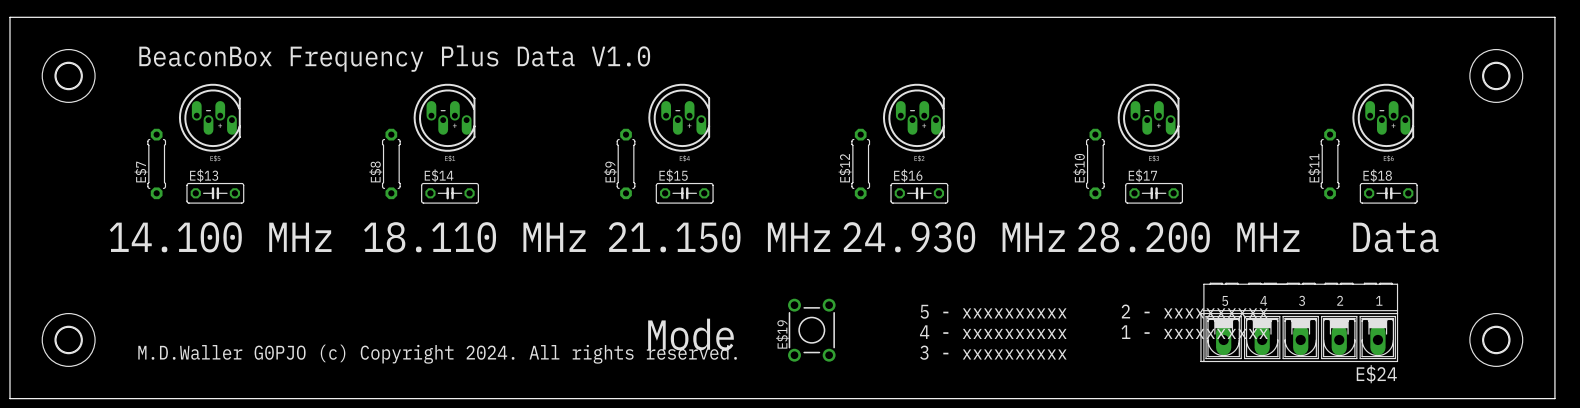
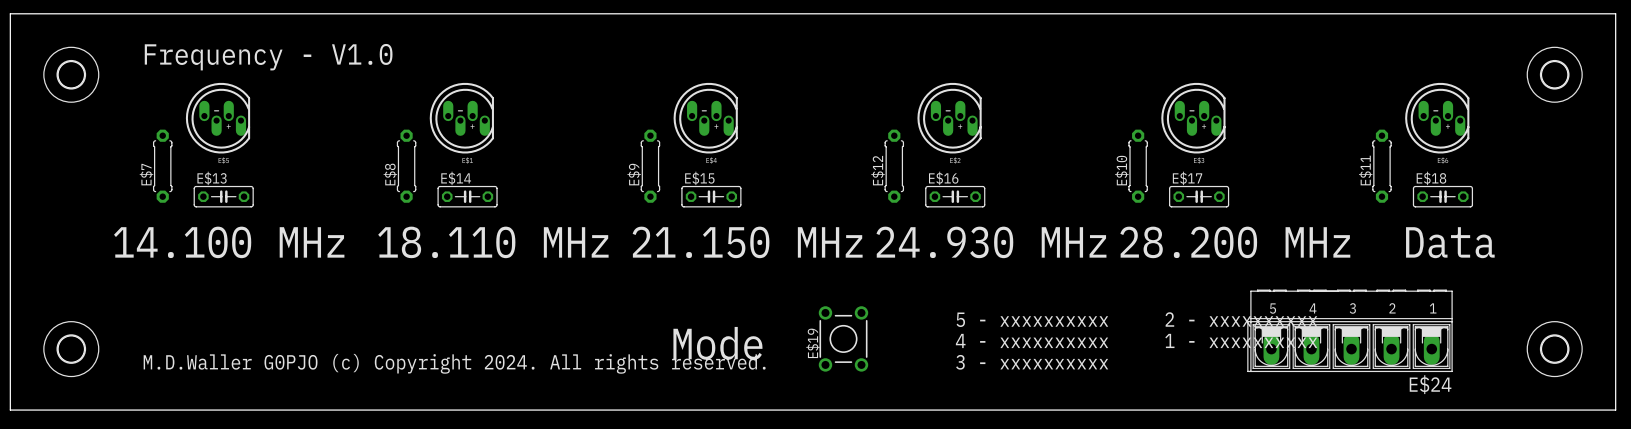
text: BeaconBox Frequency Plus Data V1.0 (394, 58) -> Frequency - V1.0 (268, 57)

